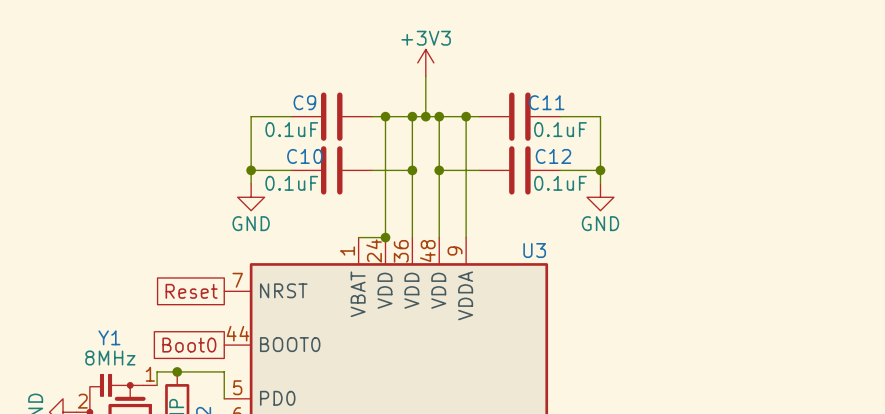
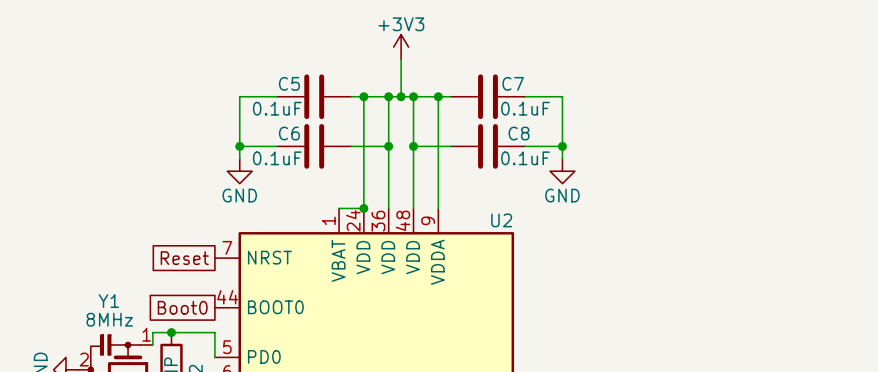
C9 name: C9 (304, 102) -> C5 (289, 83)
C11 name: C11 (546, 102) -> C7 (513, 83)
C10 name: C10 (304, 156) -> C6 (289, 133)
C12 name: C12 (553, 156) -> C8 (519, 133)
U3 name: U3 (534, 250) -> U2 (501, 220)

